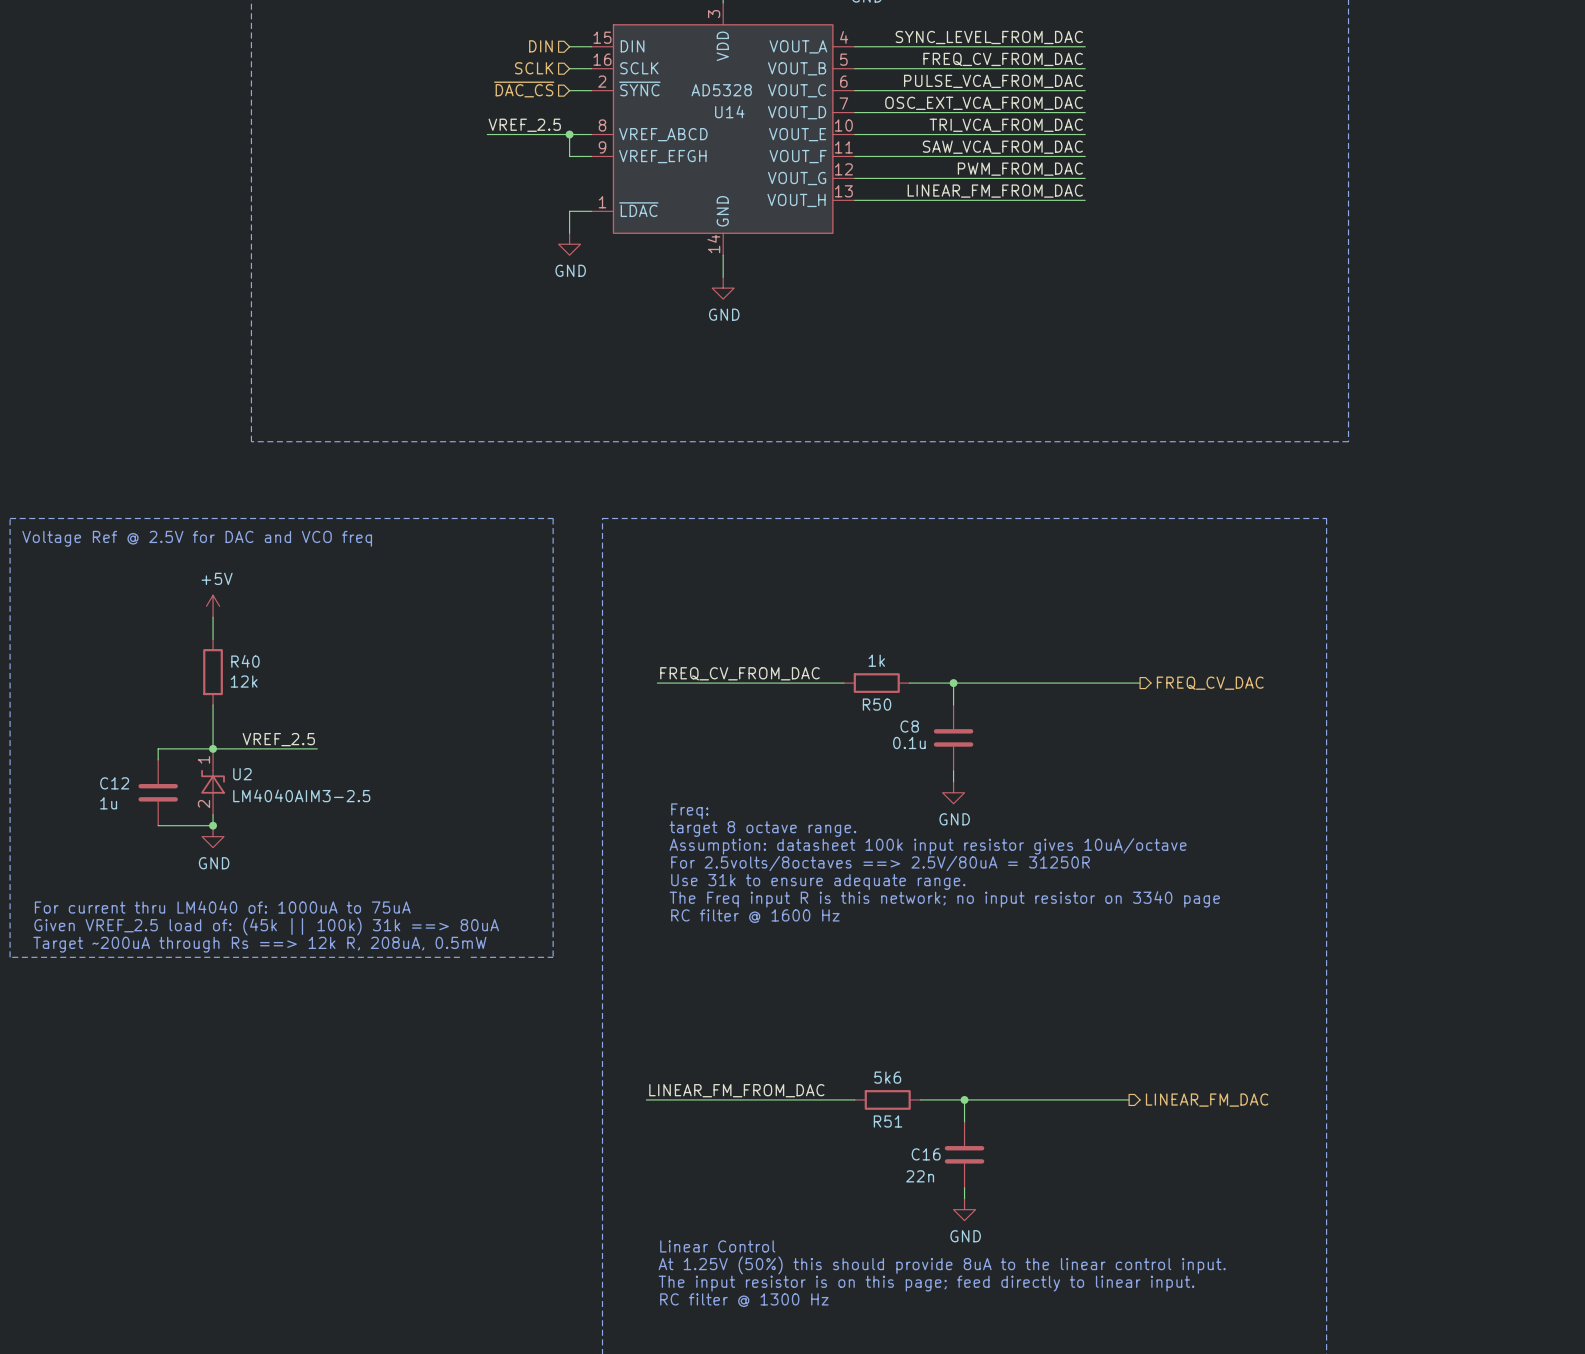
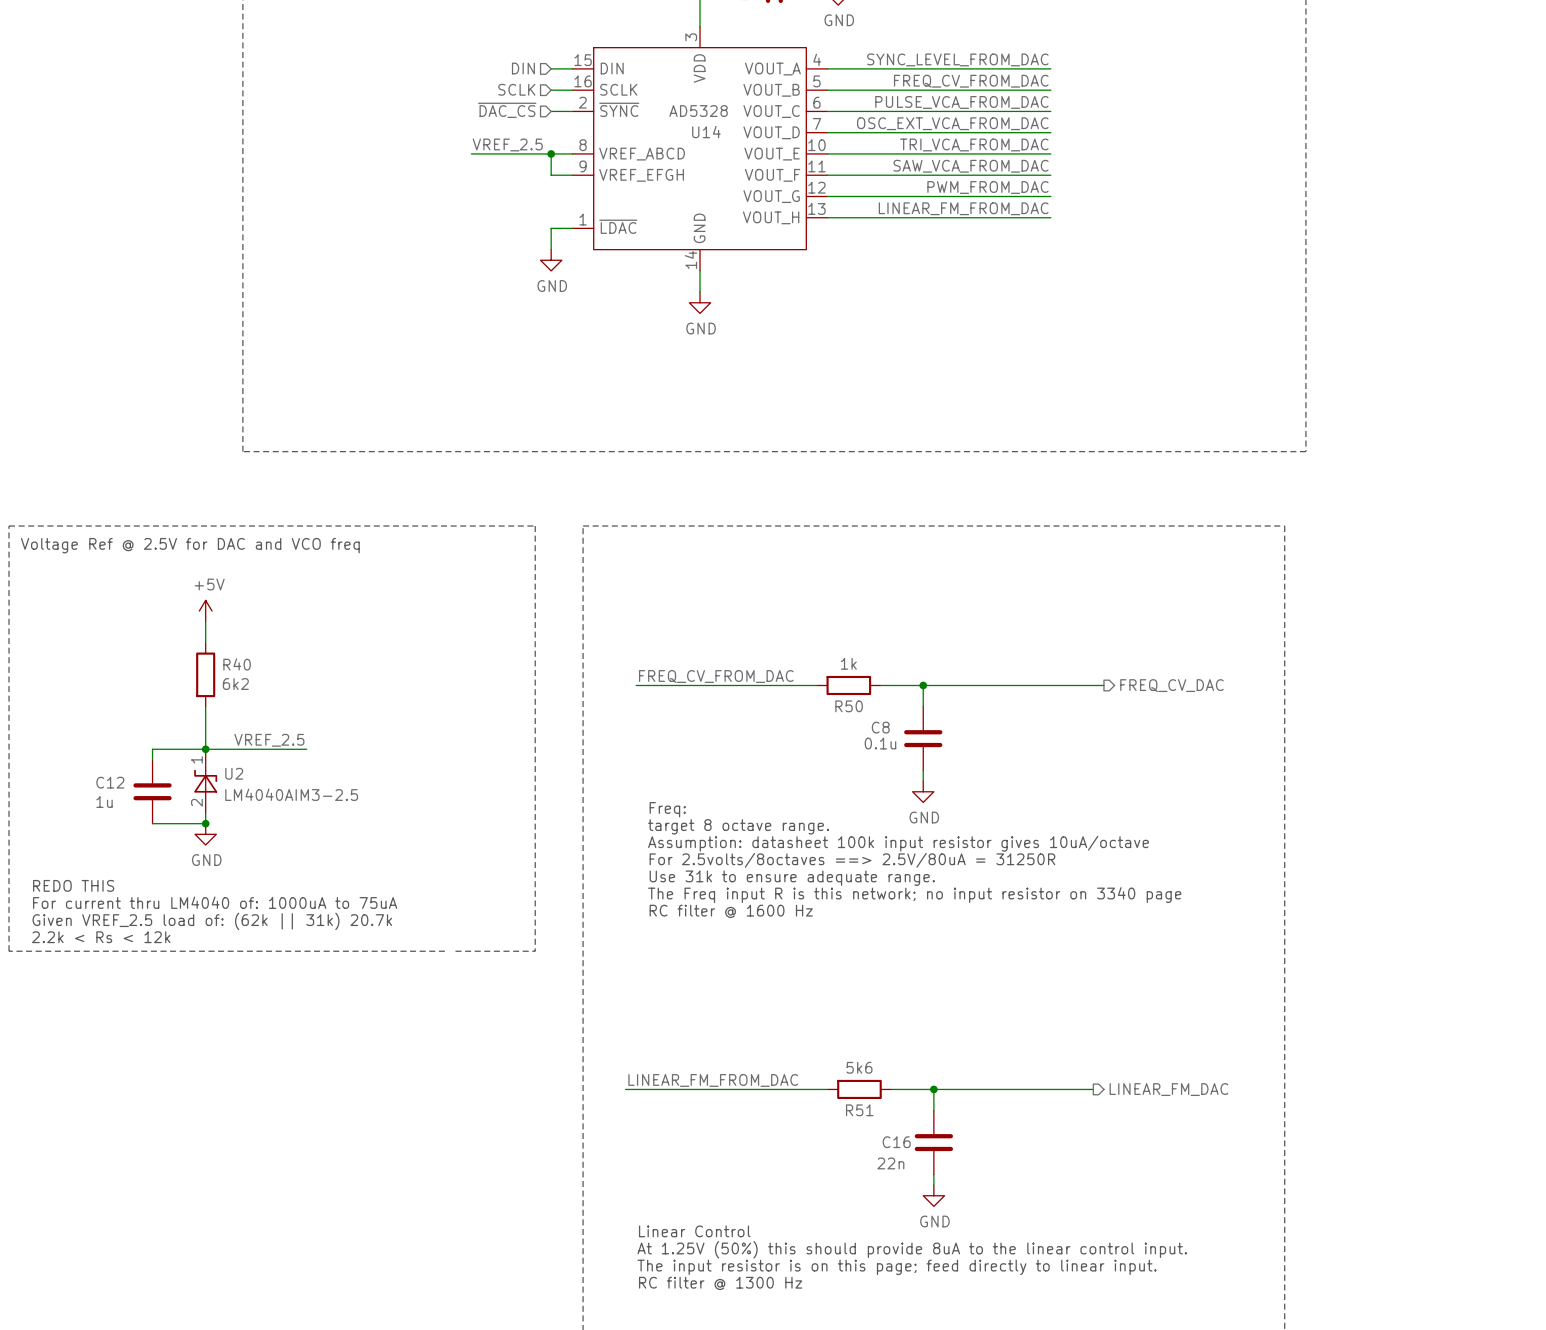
R40 value: 12k (244, 681) -> 6k2 (235, 684)
text: none -> REDO THIS (73, 885)
text: Given VREF_2.5 load of: (45k || 100k) 31k ==> 80uA (266, 926) -> Given VREF_2.5 load of: (62k || 31k) 20.7k (212, 921)
text: Target ~200uA through Rs ==> 12k R, 208uA, 0.5mW (259, 944) -> 2.2k < Rs < 12k (101, 937)

